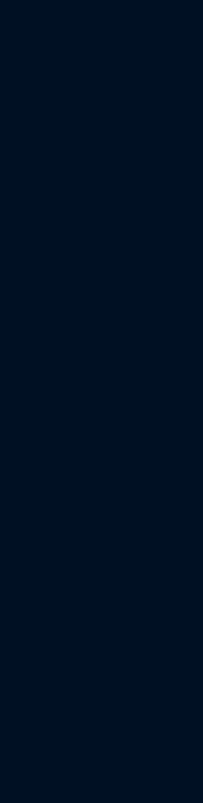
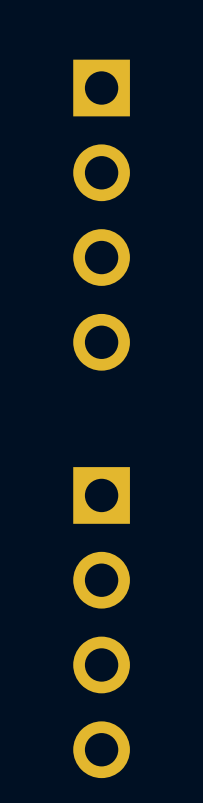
part: none -> (101, 215)
part: none -> (101, 622)

